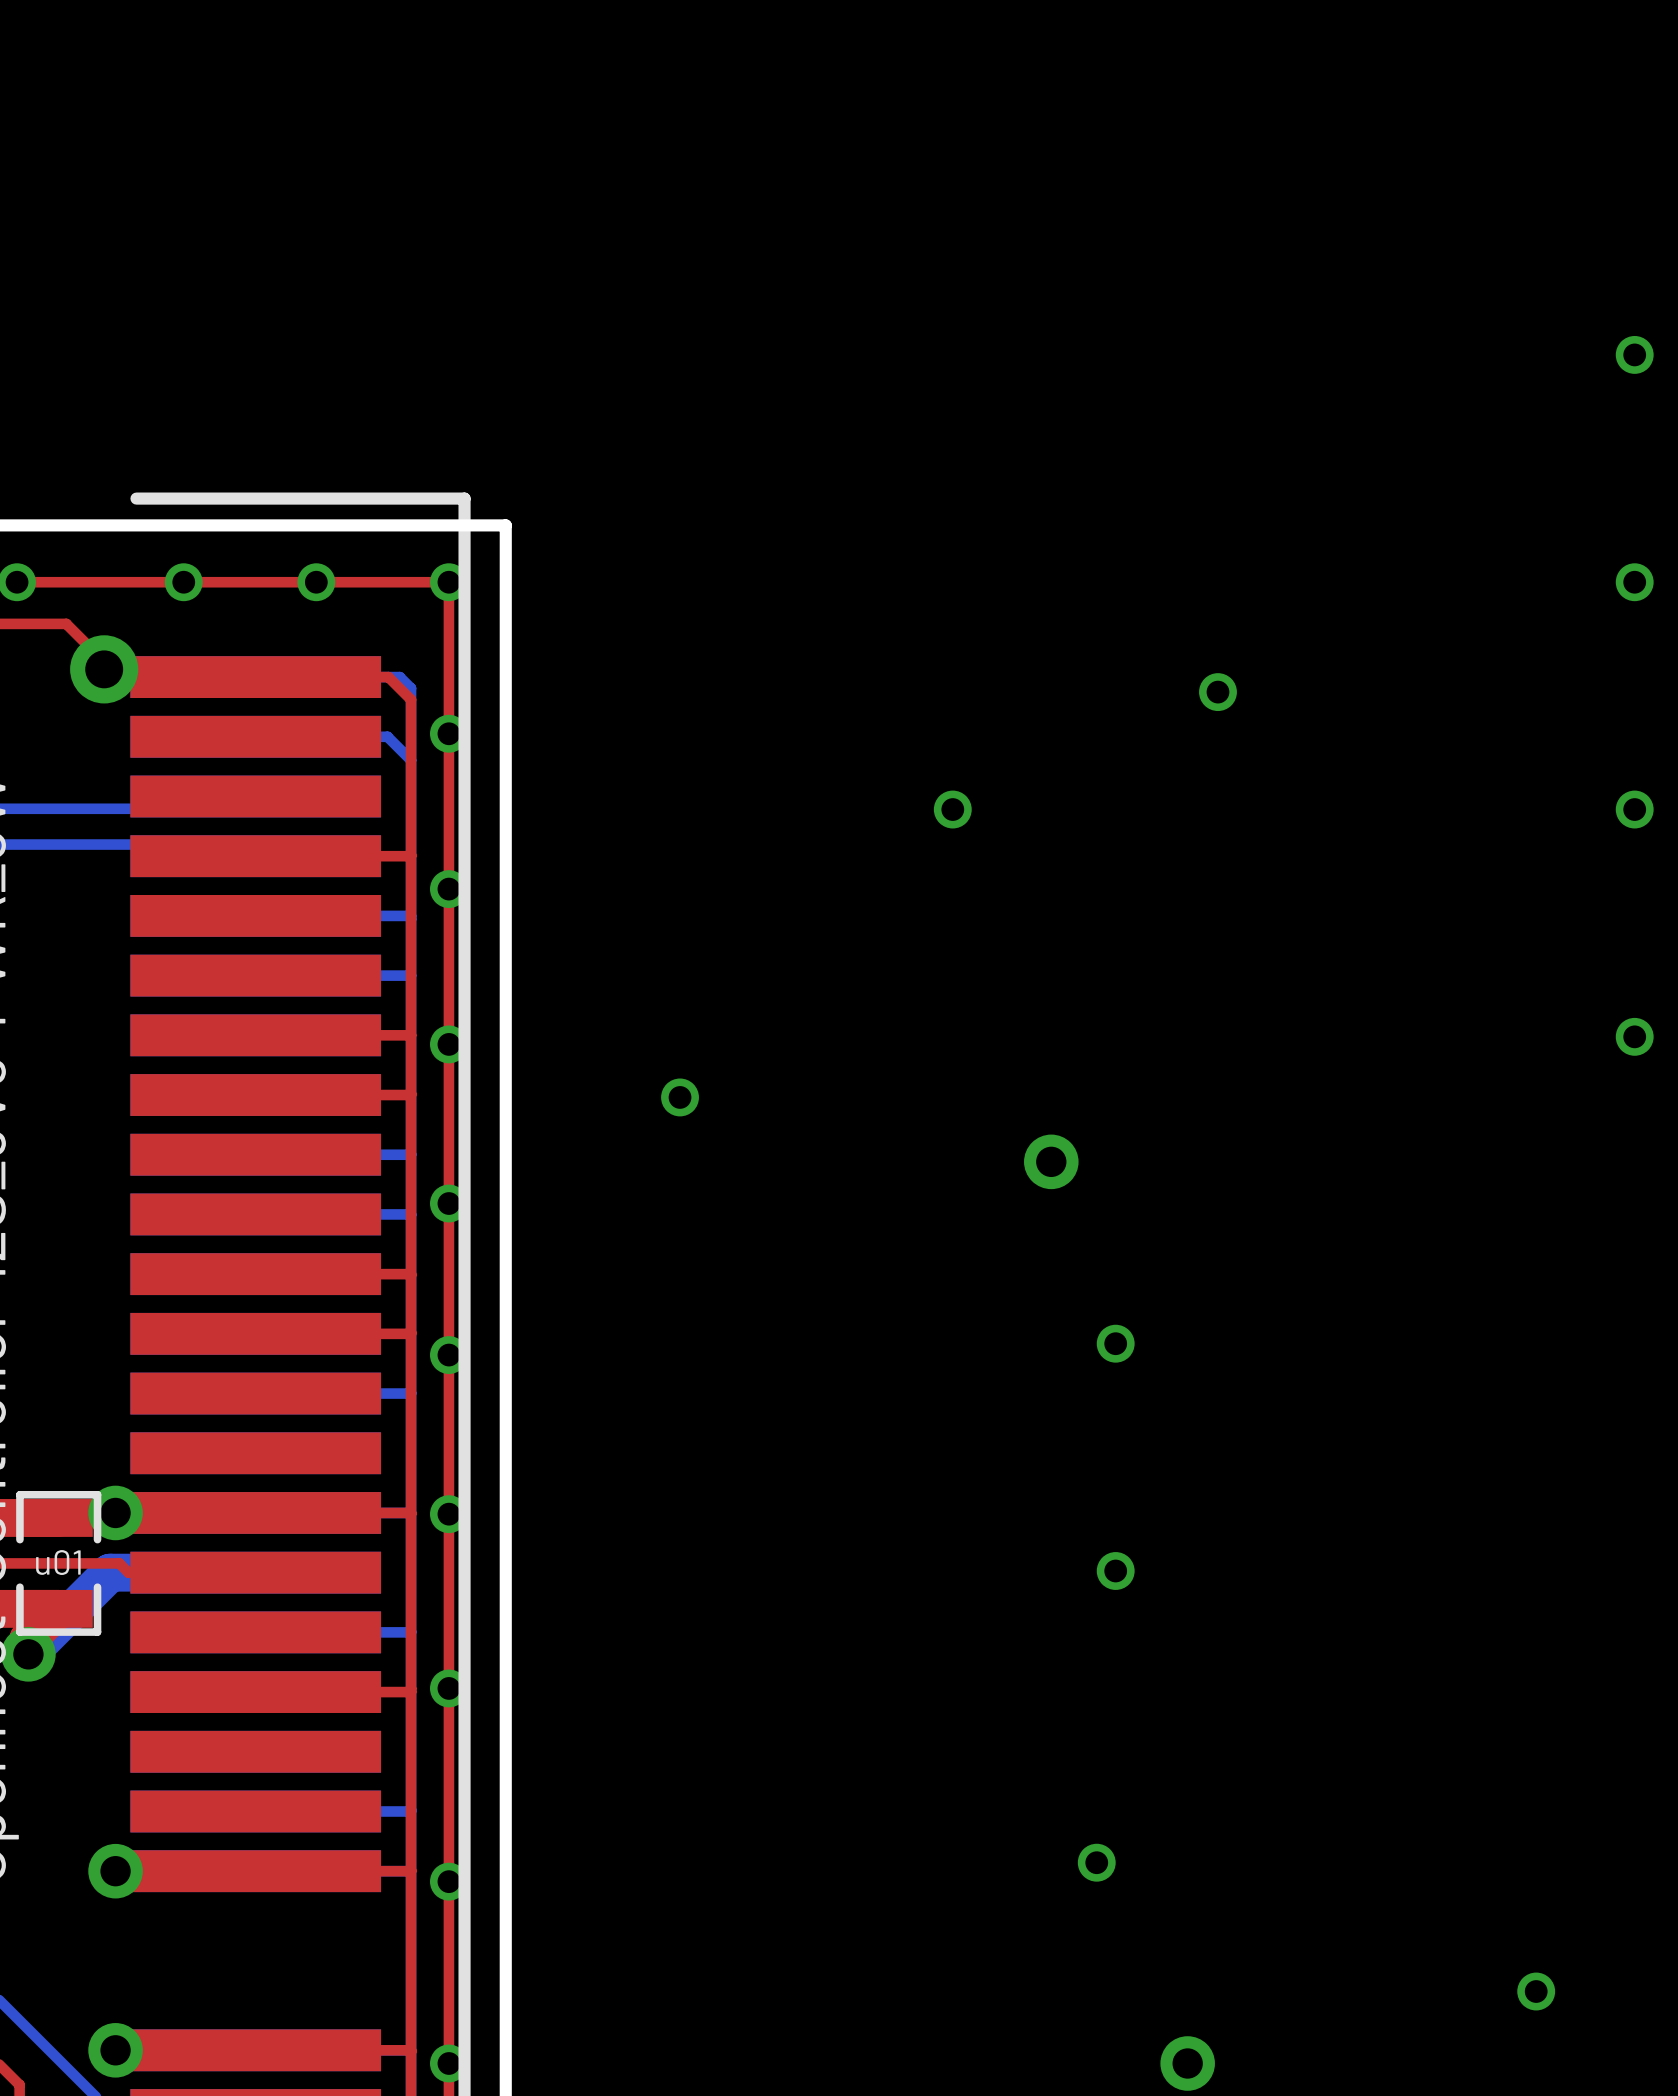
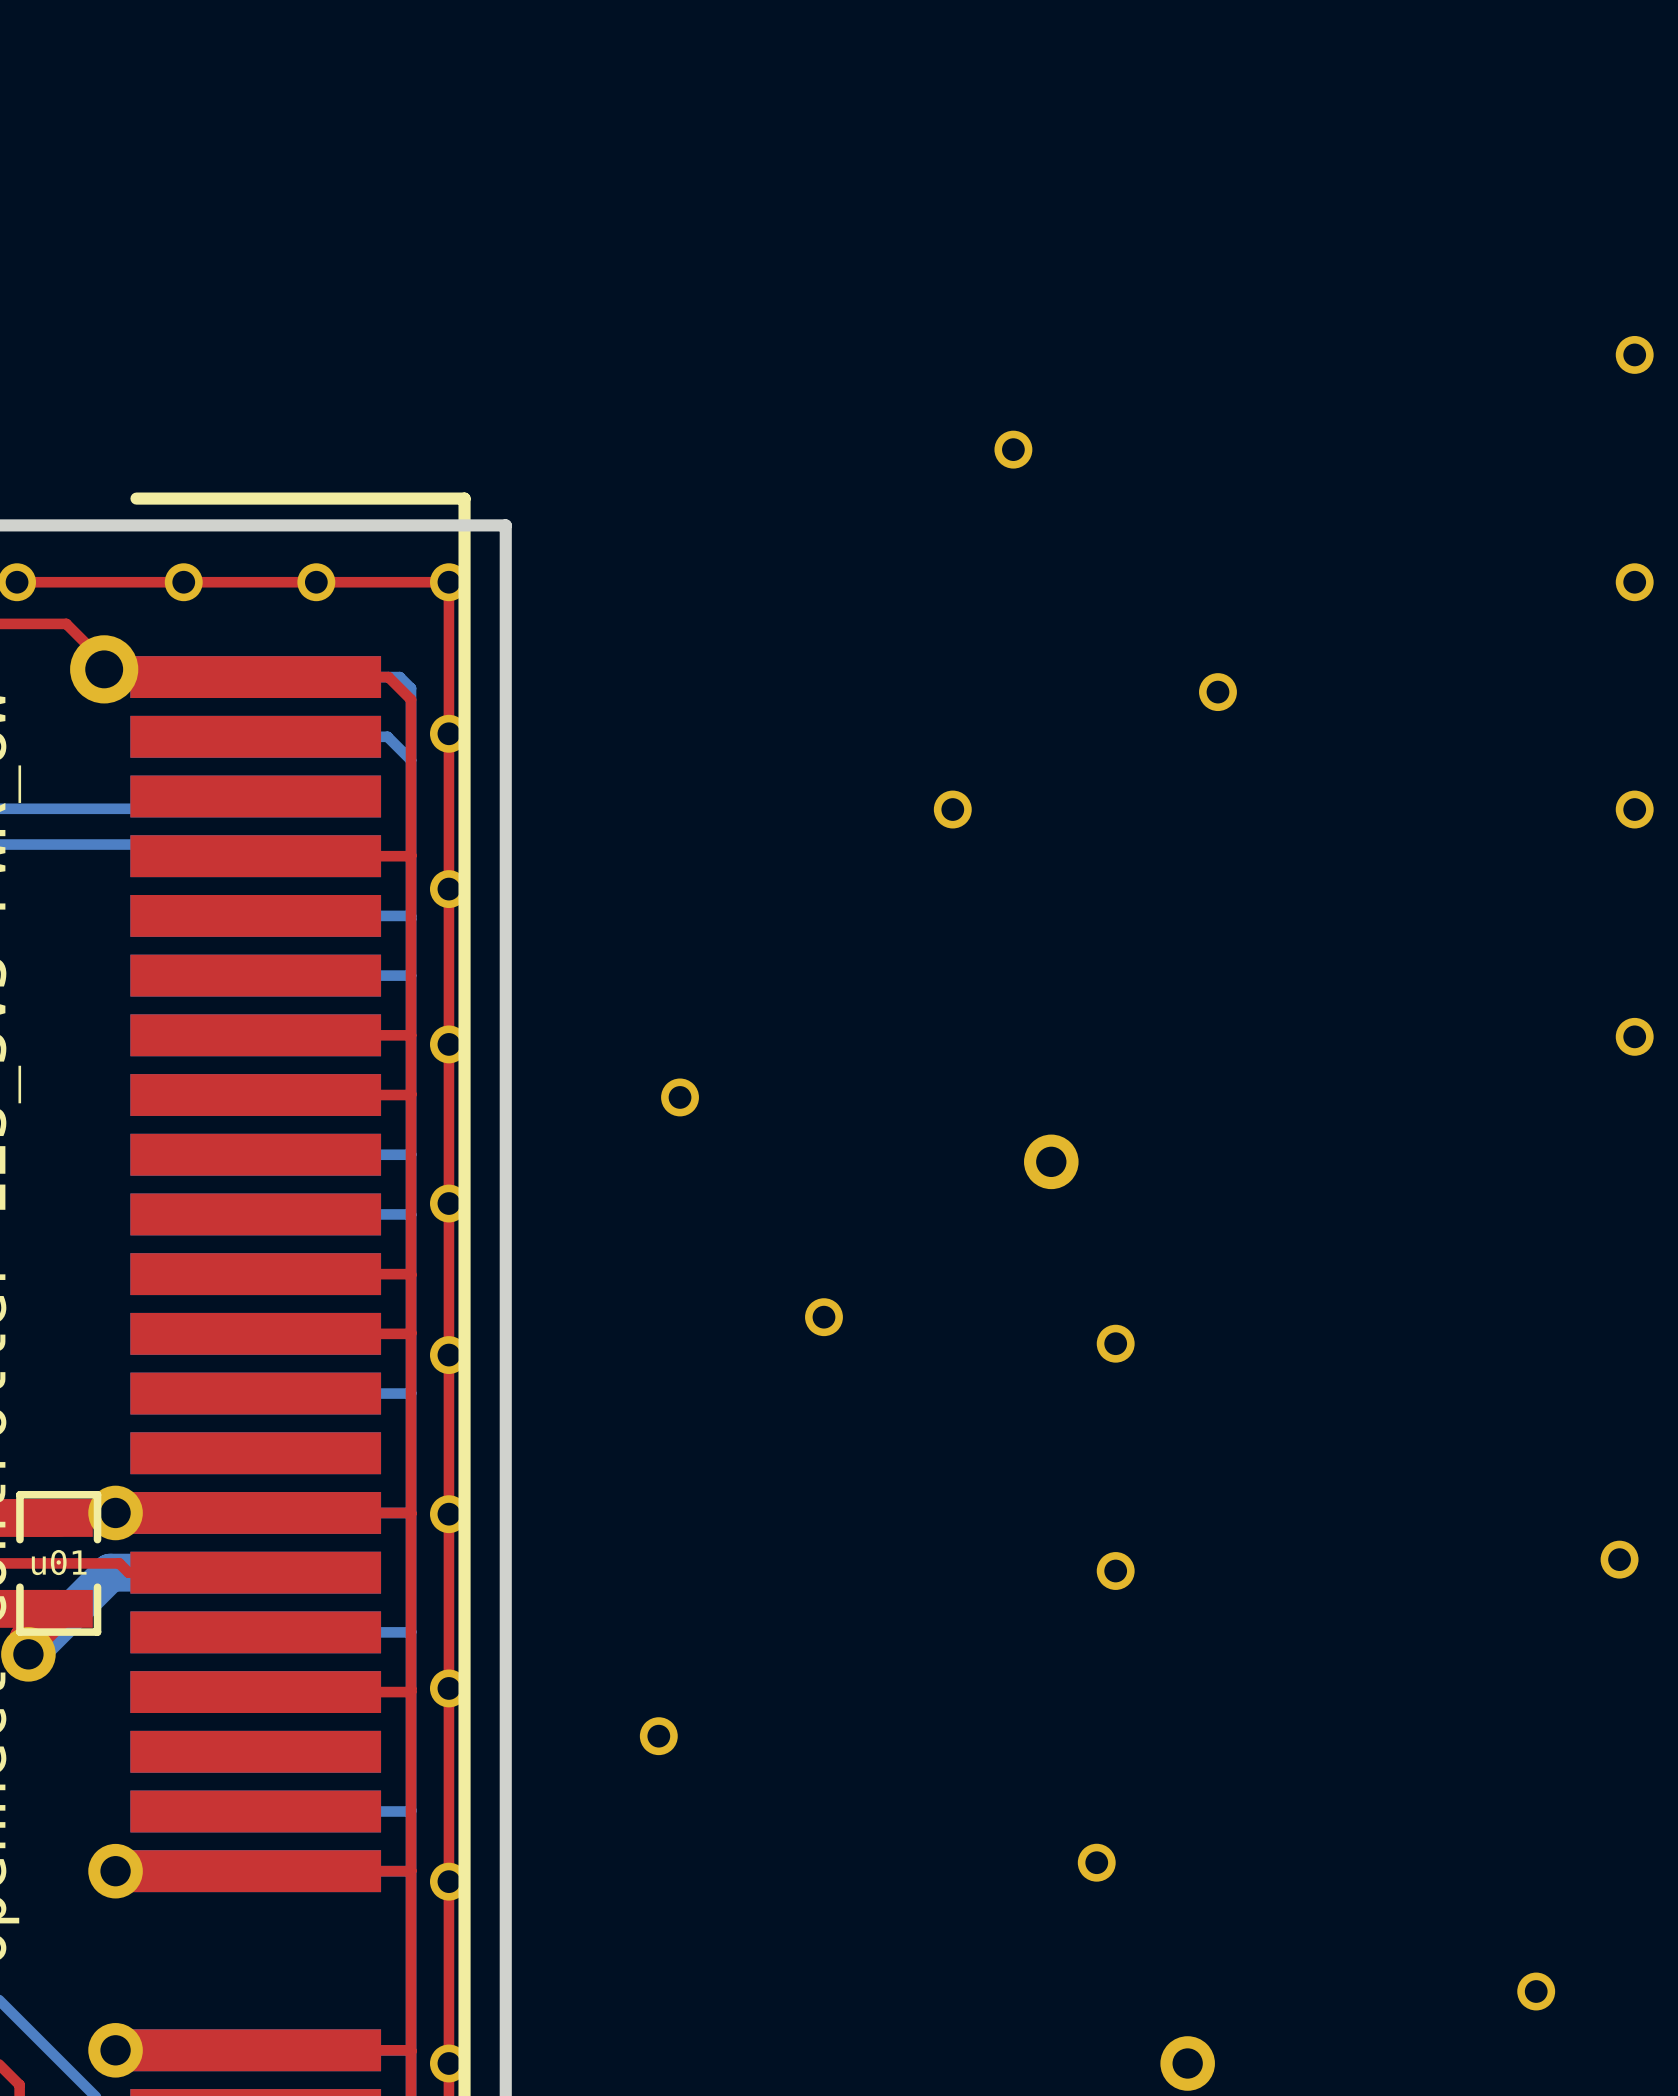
part: none -> (1013, 449)
part: none -> (823, 1317)
part: none -> (1619, 1559)
part: none -> (658, 1736)

